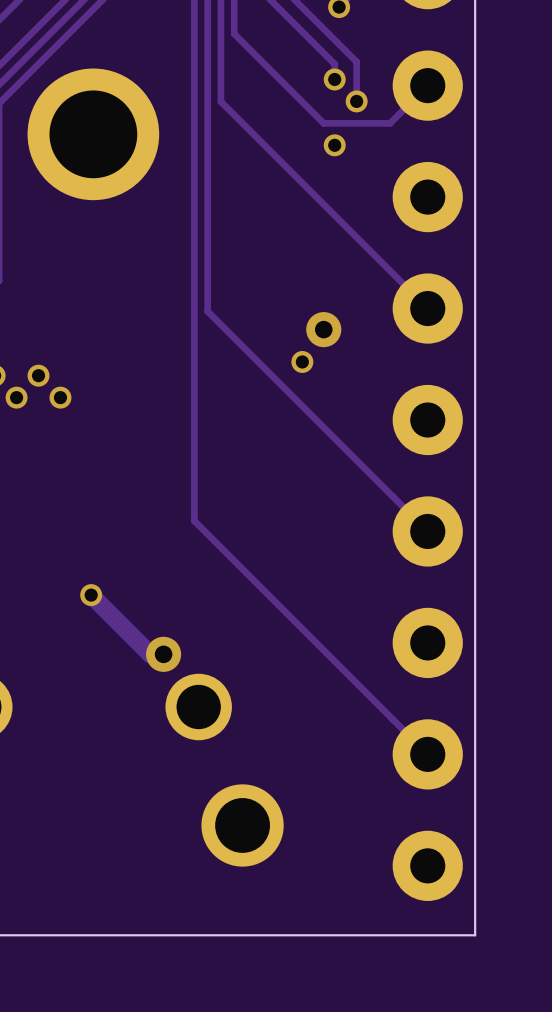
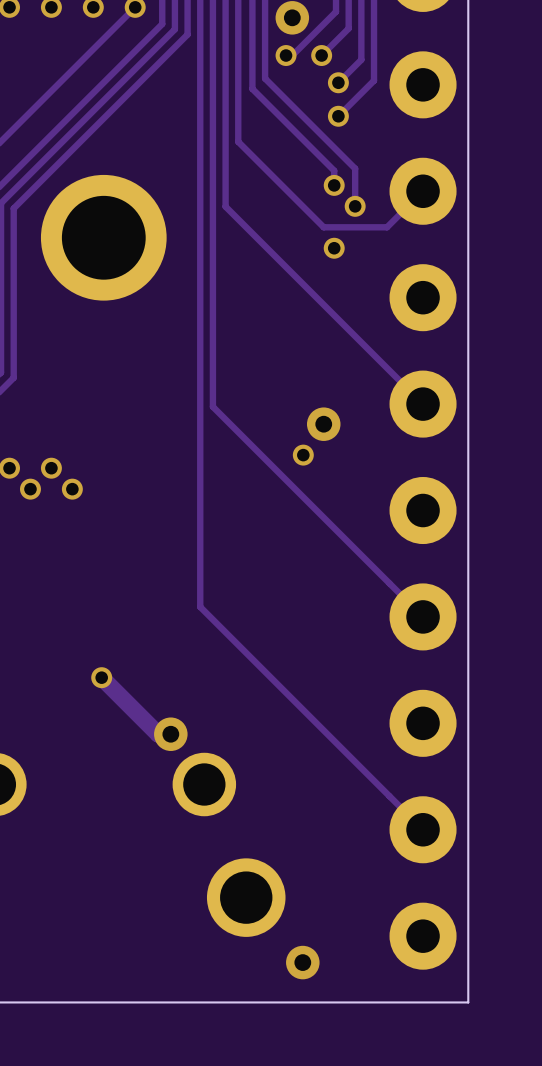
via: none -> (302, 962)

